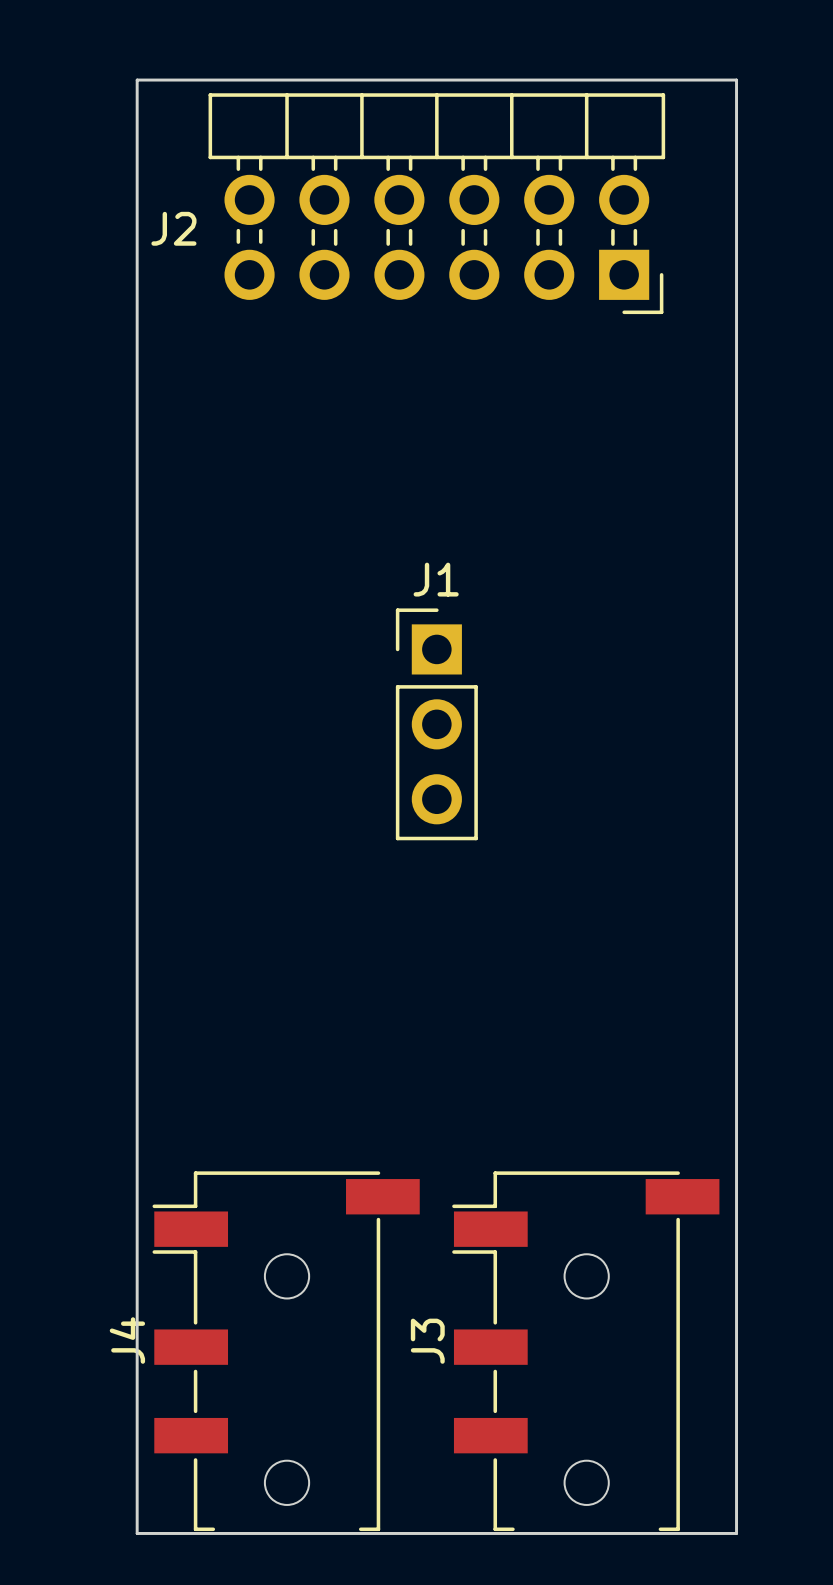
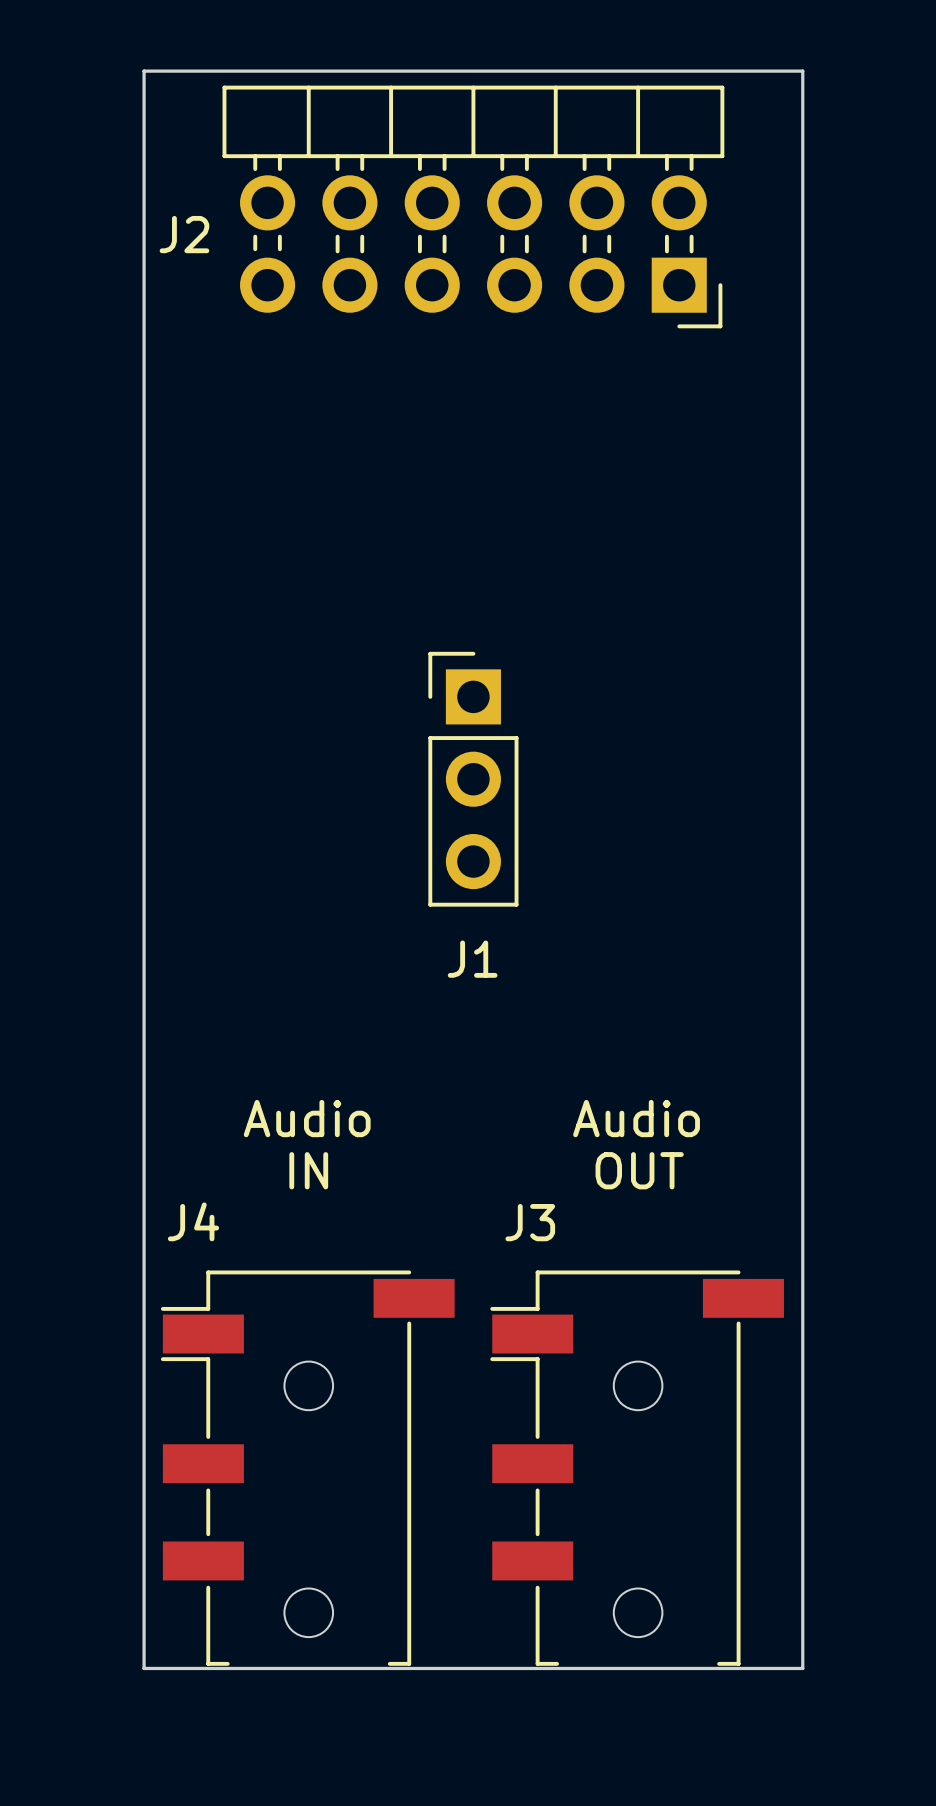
J1 name position: J1 (436, 579) -> J1 (472, 959)
text: none -> Audio (307, 1118)
text: none -> Audio (636, 1118)
text: none -> IN (308, 1170)
text: none -> OUT (639, 1170)
J4 name rotation: 0° (127, 1340) -> 90° clockwise (193, 1221)
J4 name position: J4 (127, 1340) -> J4 (193, 1221)
J3 name rotation: 0° (427, 1341) -> 90° clockwise (530, 1222)
J3 name position: J3 (427, 1341) -> J3 (530, 1222)

